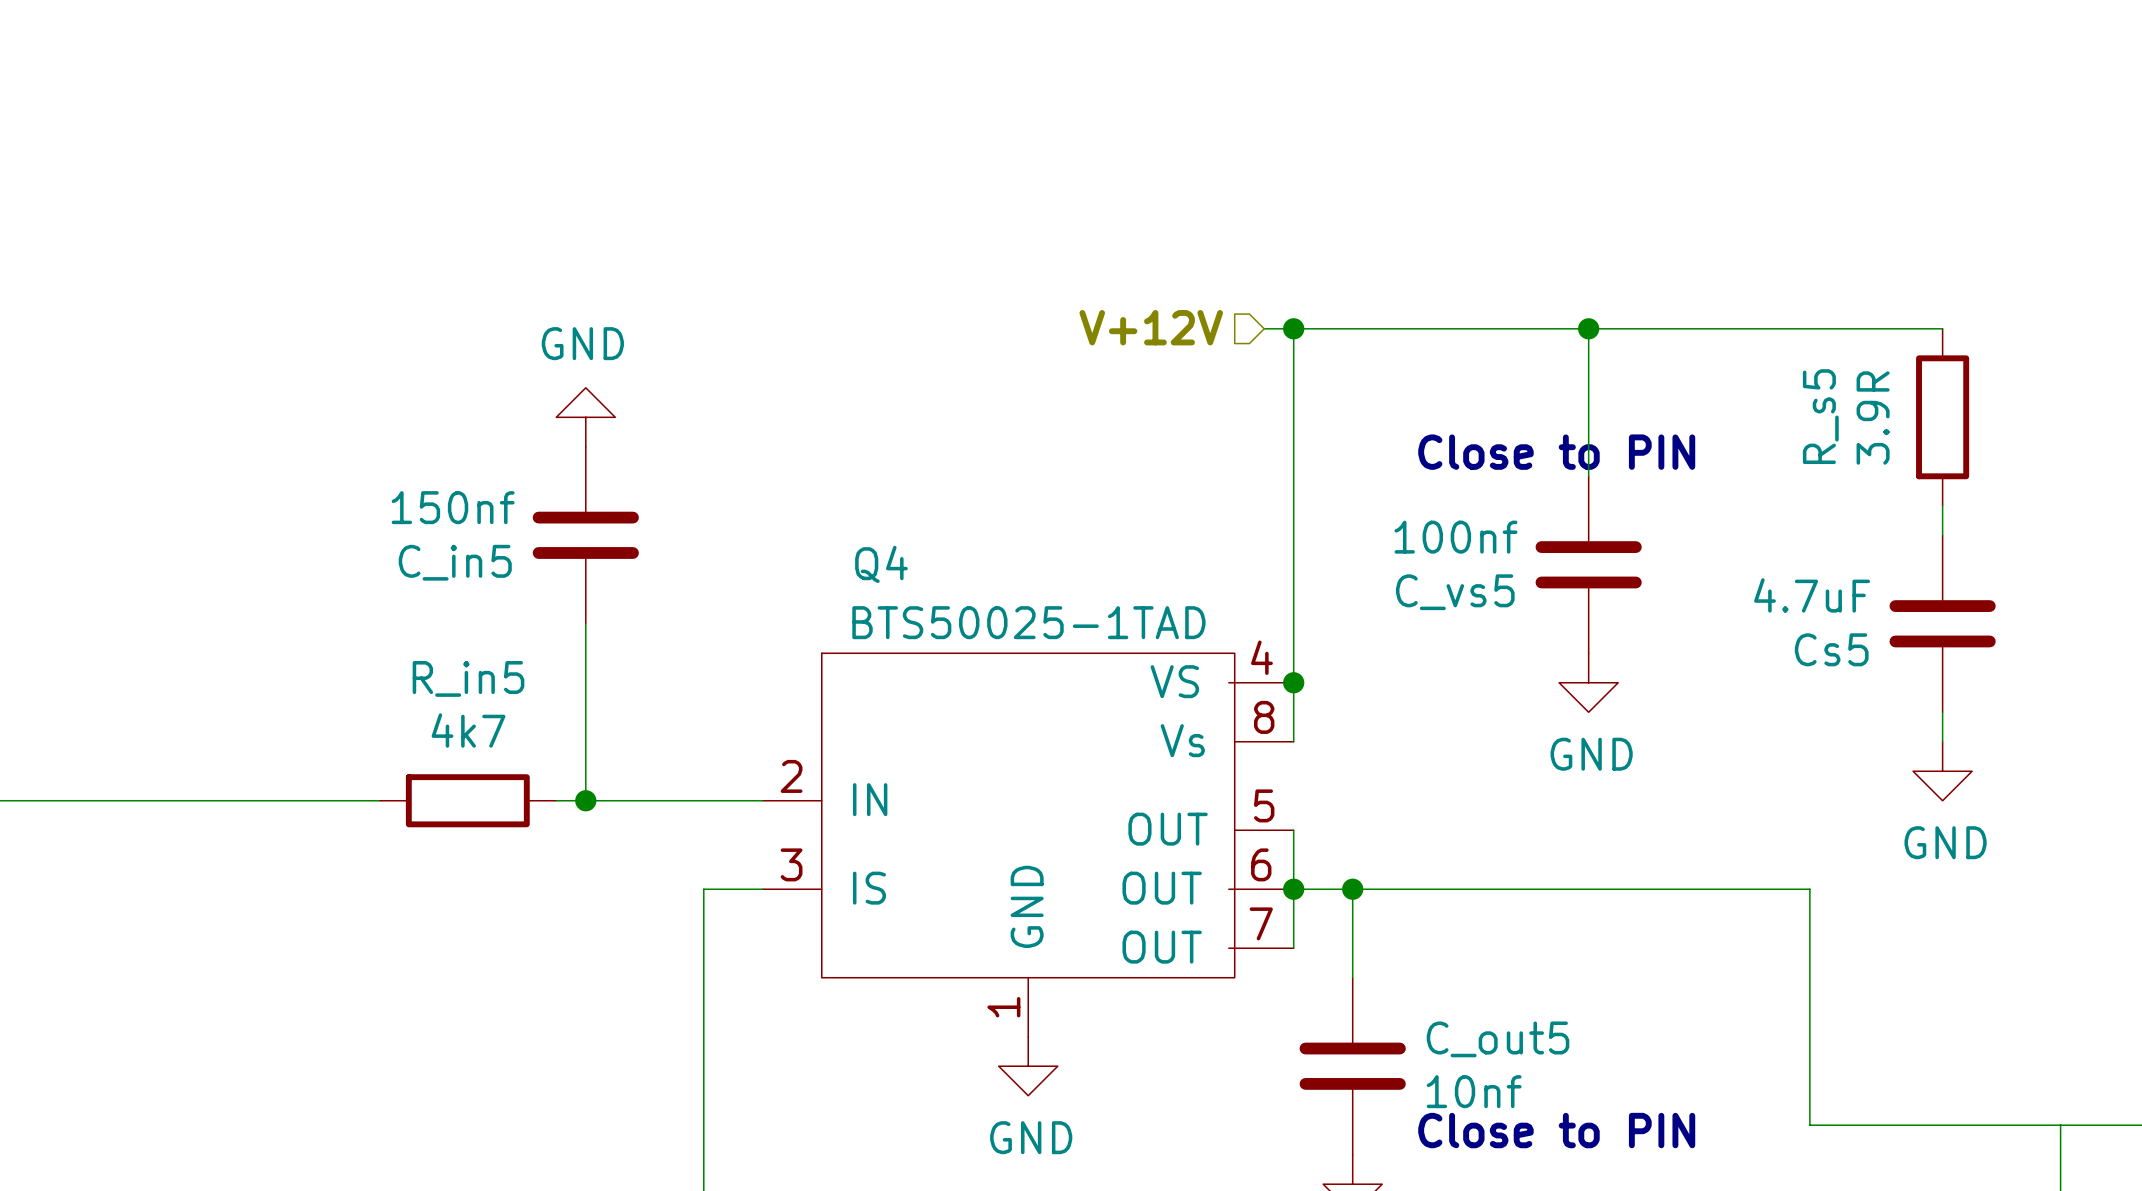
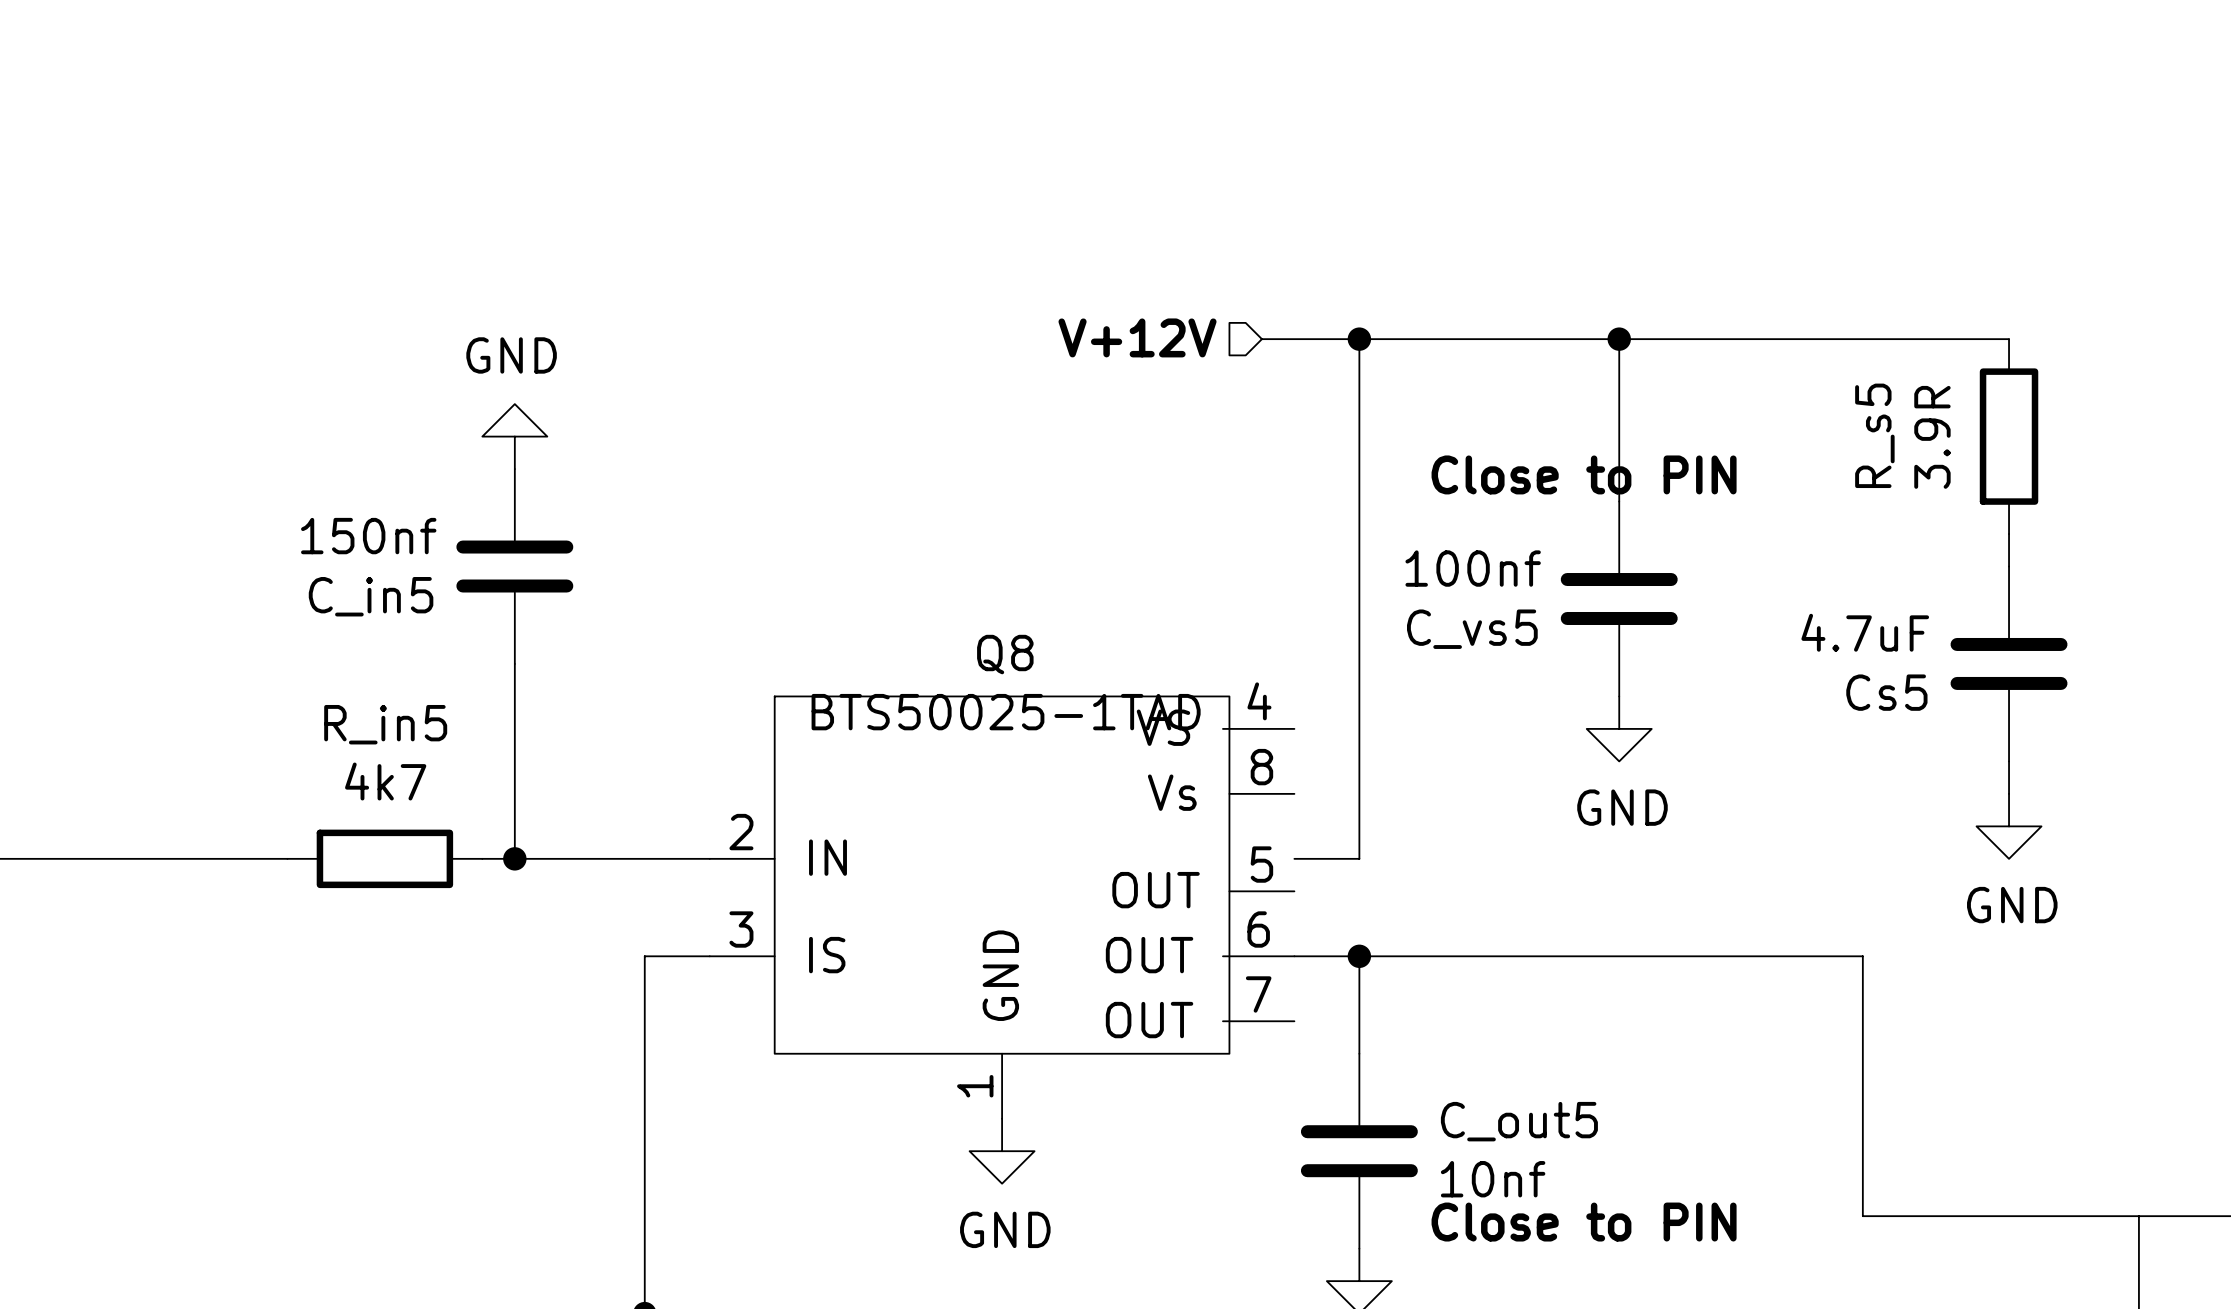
wire: (1293, 328) (1293, 741) -> none
junction position: (1293, 328) -> (1359, 339)
wire: none -> (1359, 339) (1359, 858) (1294, 858)
Q4 name: Q4 (881, 564) -> Q8 (1005, 654)
Q4 value position: BTS50025-1TAD (1028, 622) -> BTS50025-1TAD (1006, 712)
junction: (1293, 682) -> none
wire: (1293, 830) (1293, 948) -> none
junction: (1293, 889) -> none

